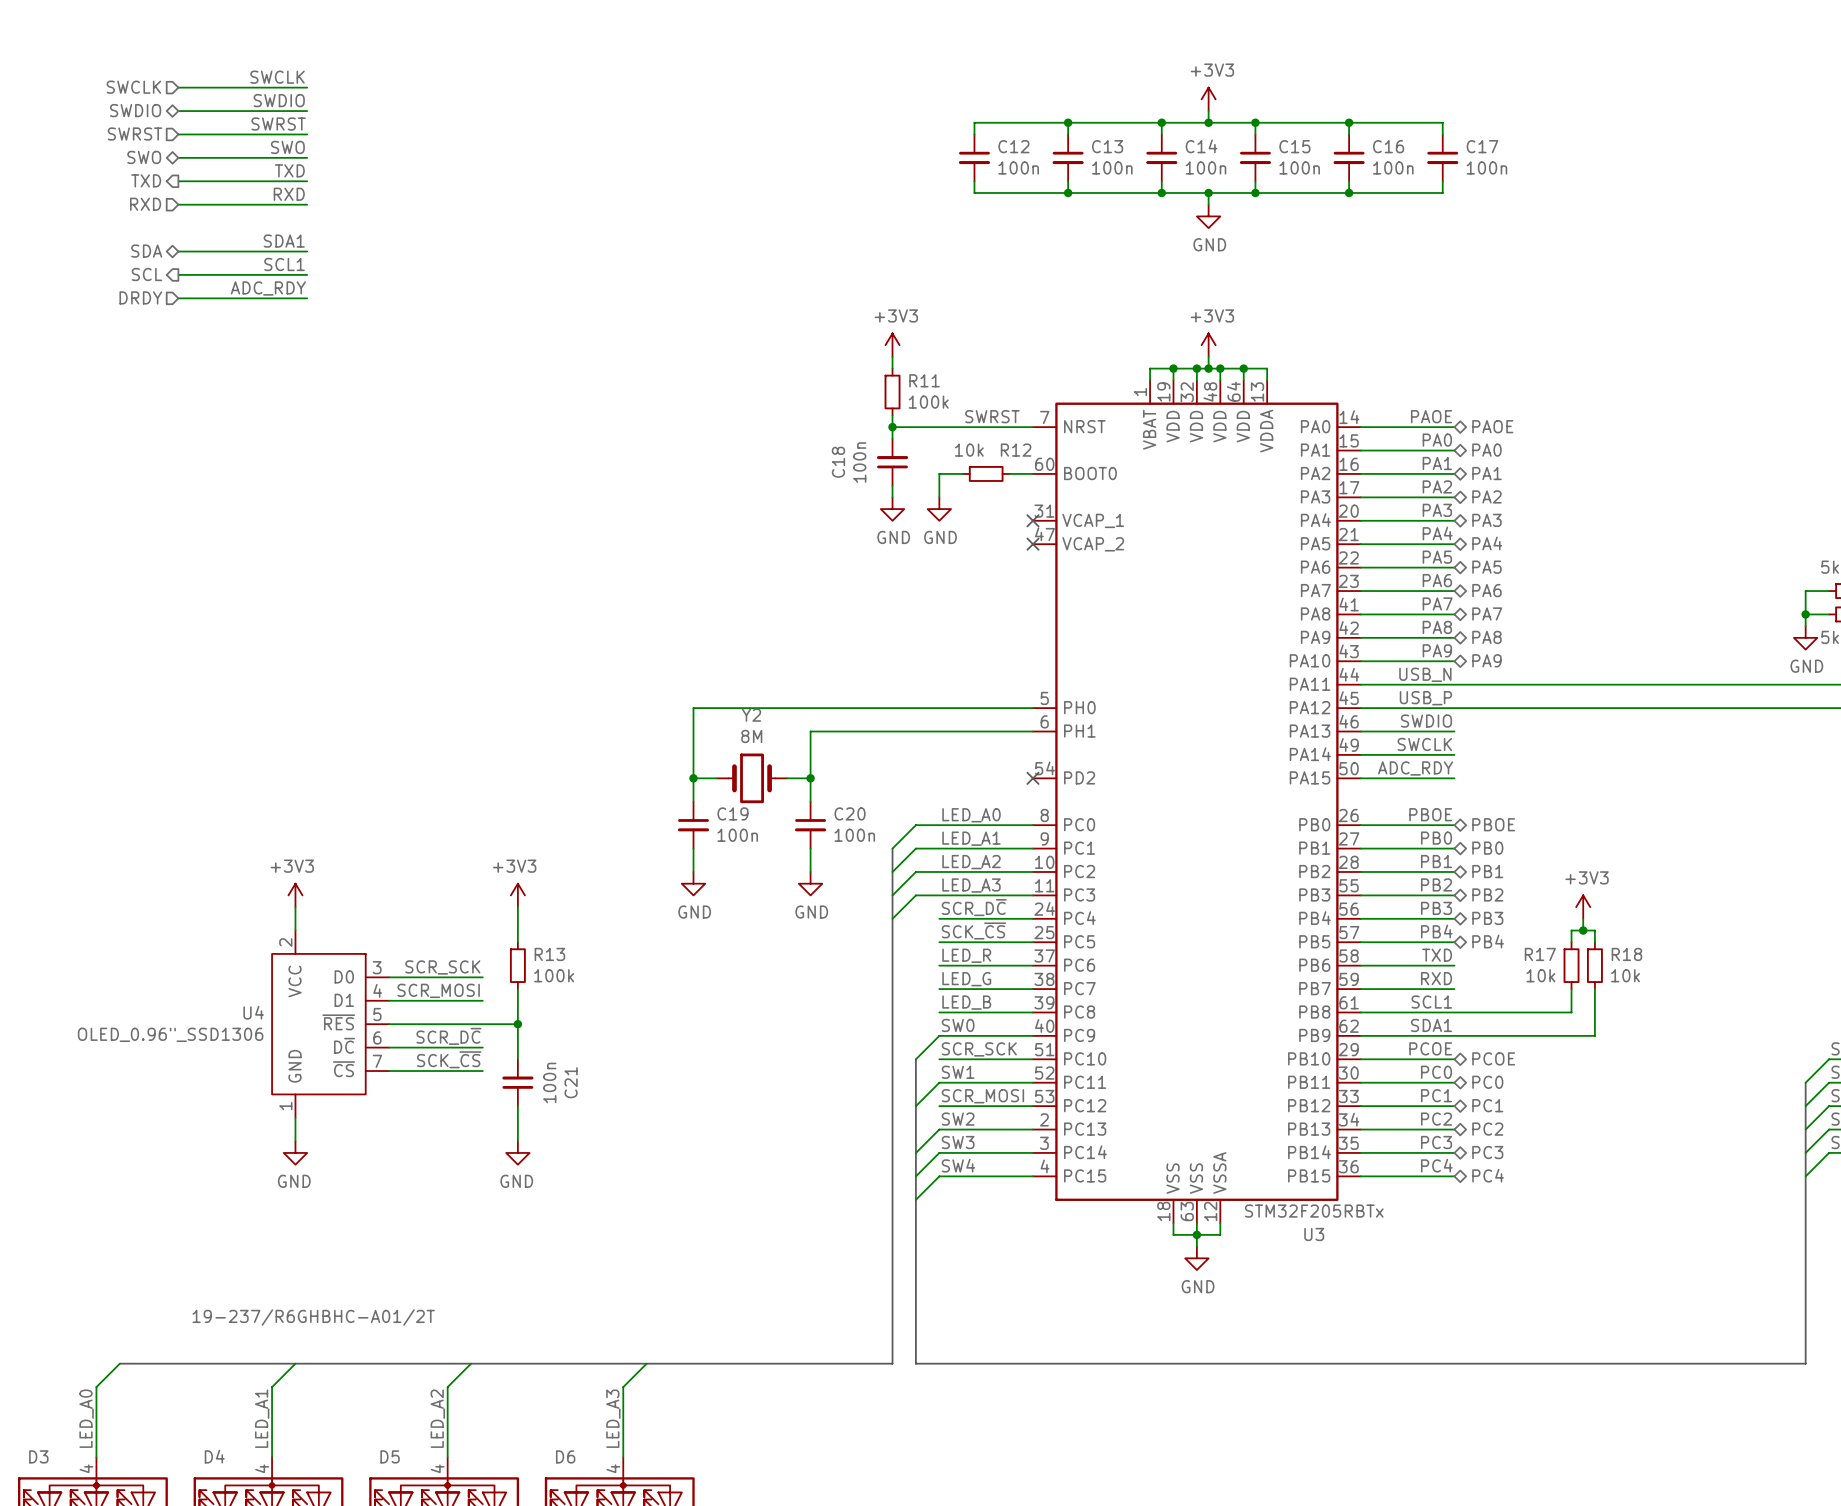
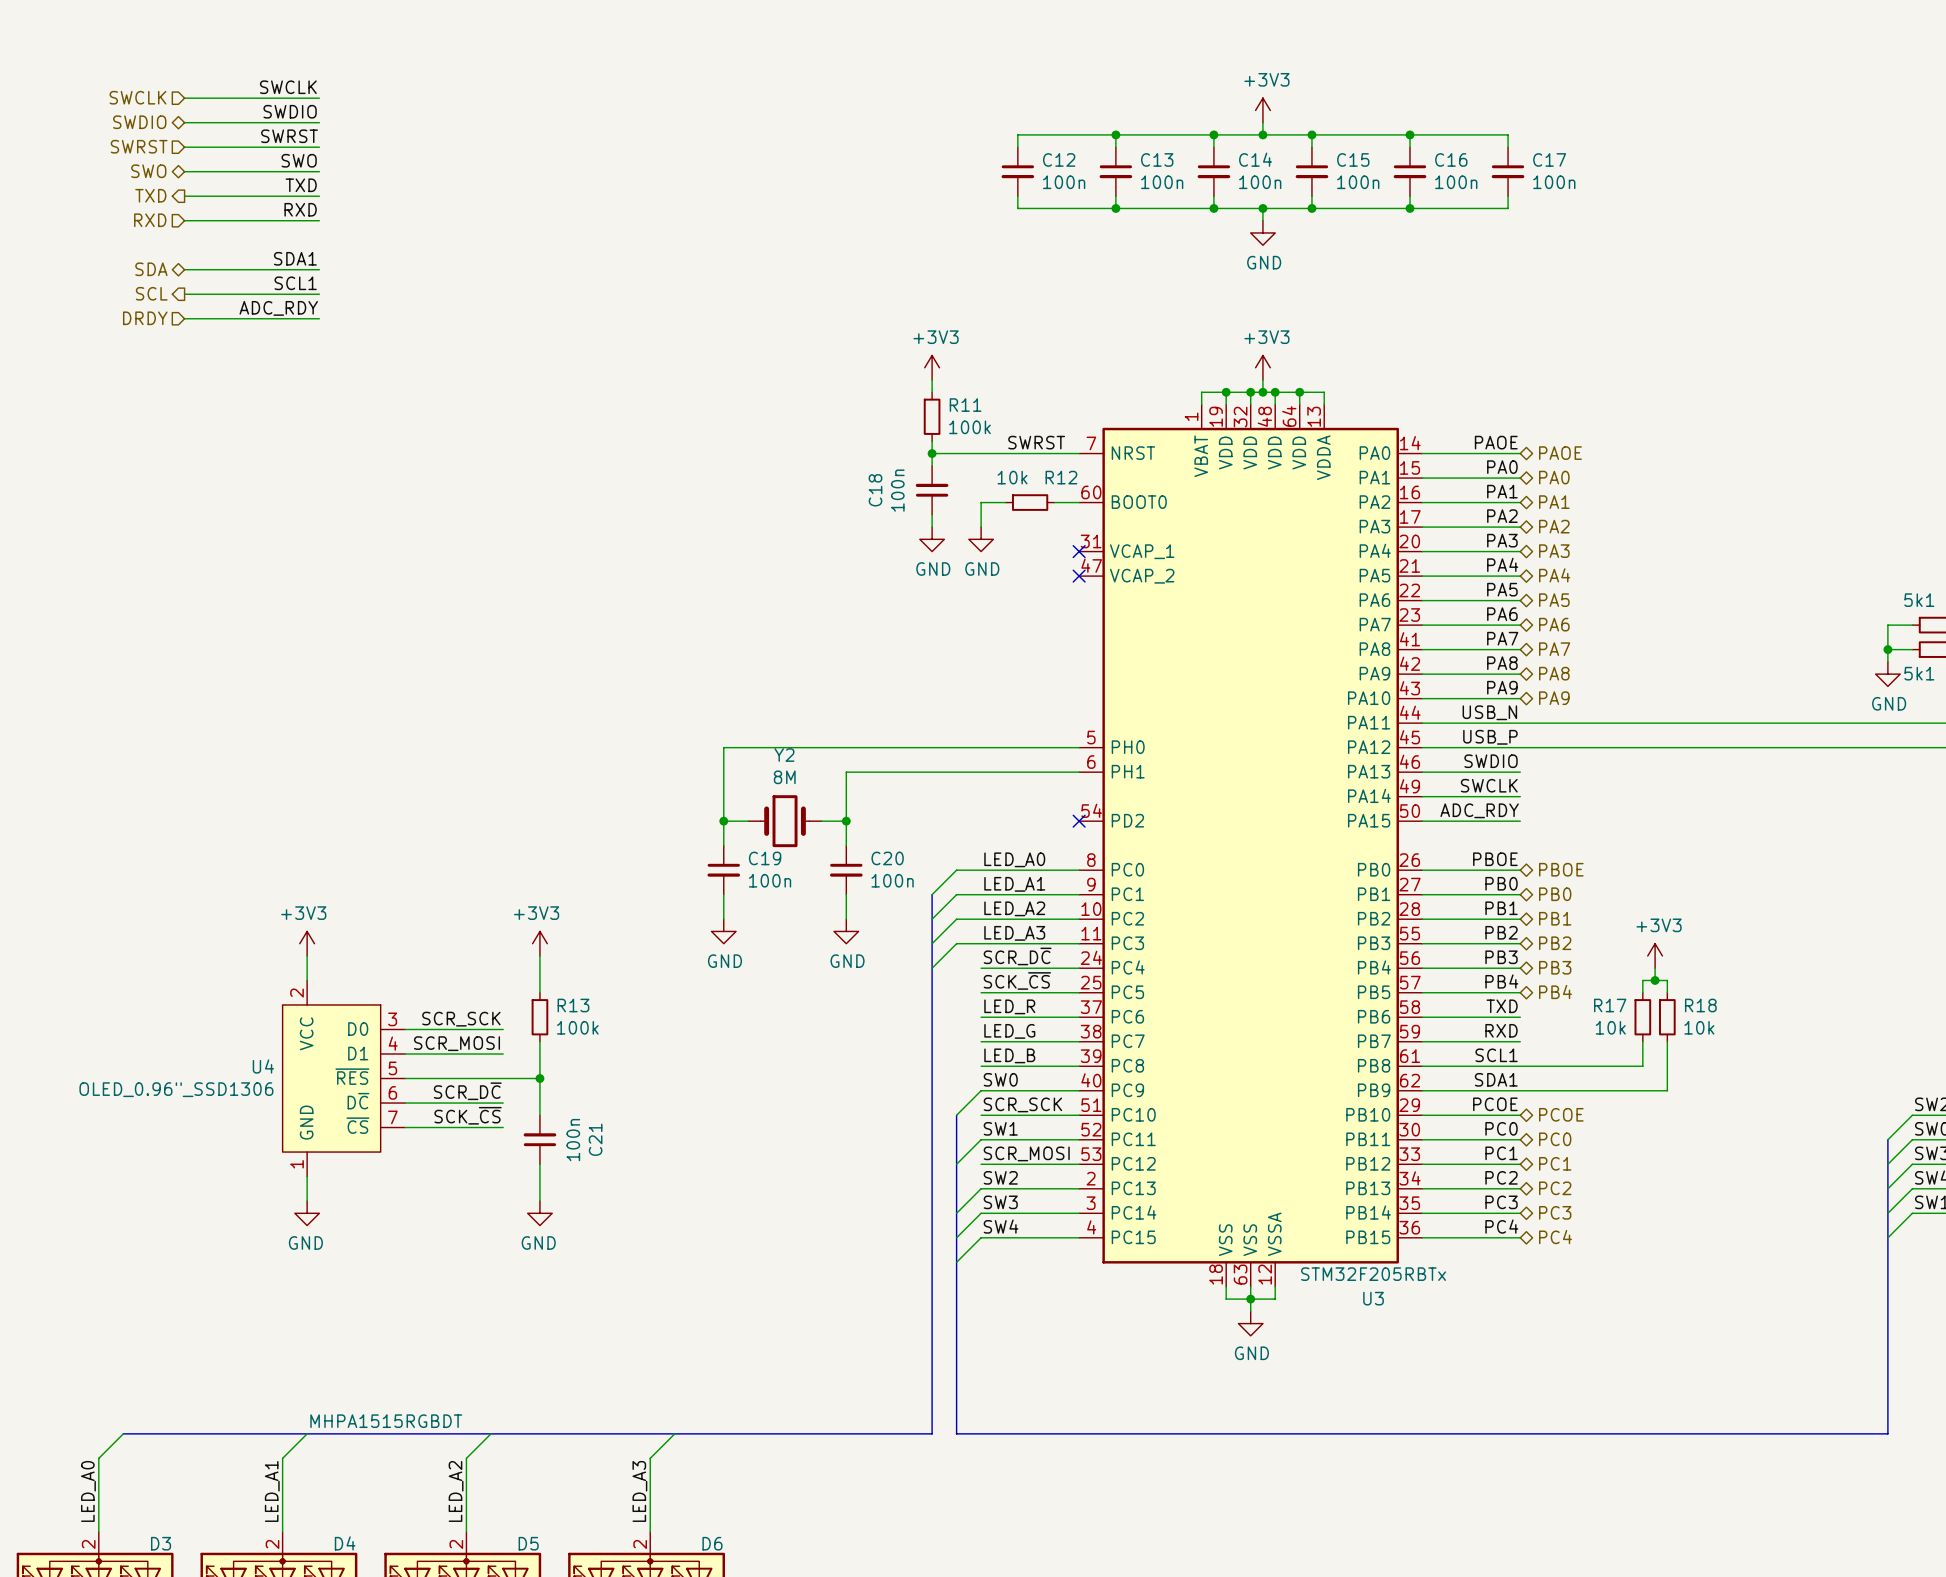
D3 value: 19-237/R6GHBHC-A01/2T (313, 1317) -> MHPA1515RGBDT (386, 1421)
D3 name position: D3 (38, 1456) -> D3 (161, 1543)
D4 name position: D4 (214, 1456) -> D4 (345, 1543)
D5 name position: D5 (390, 1456) -> D5 (528, 1543)
D6 name position: D6 (565, 1456) -> D6 (712, 1543)
D3 pin number: 4 (86, 1468) -> 2 (88, 1544)
D4 pin number: 4 (262, 1468) -> 2 (272, 1544)
D5 pin number: 4 (437, 1468) -> 2 (456, 1544)
D6 pin number: 4 (613, 1468) -> 2 (640, 1544)

